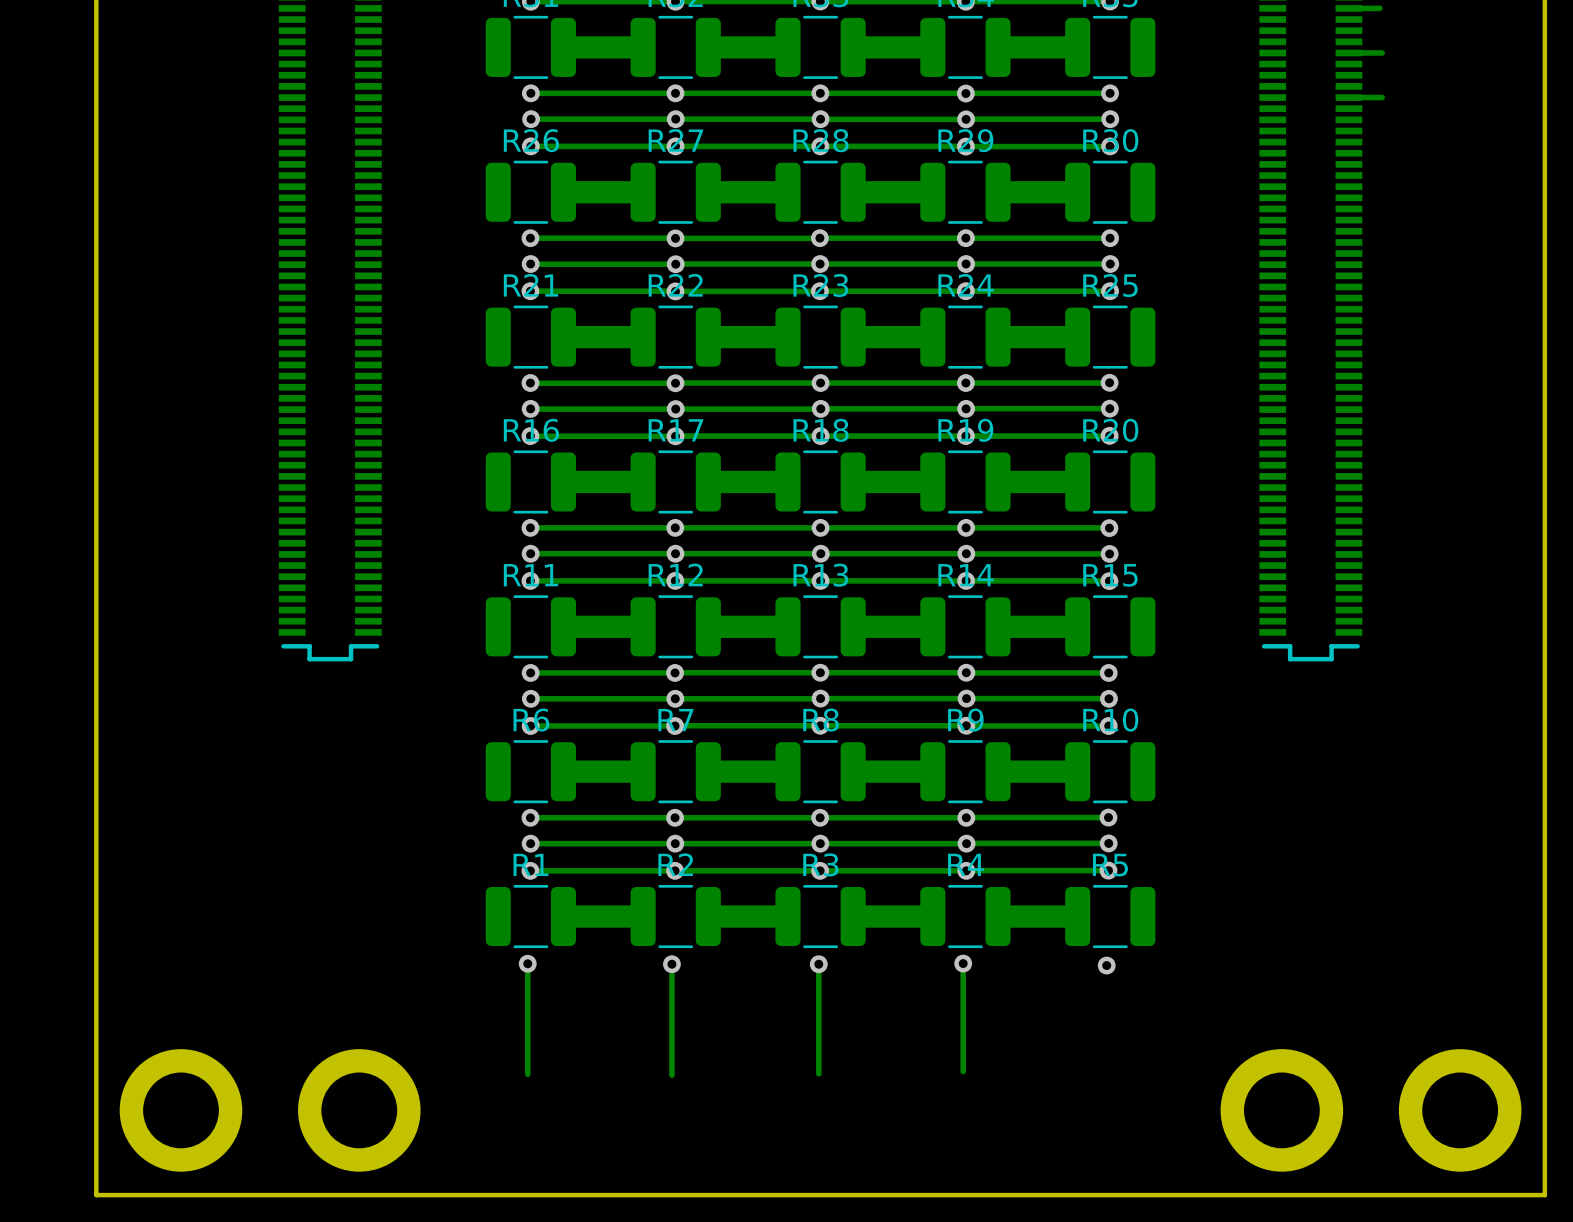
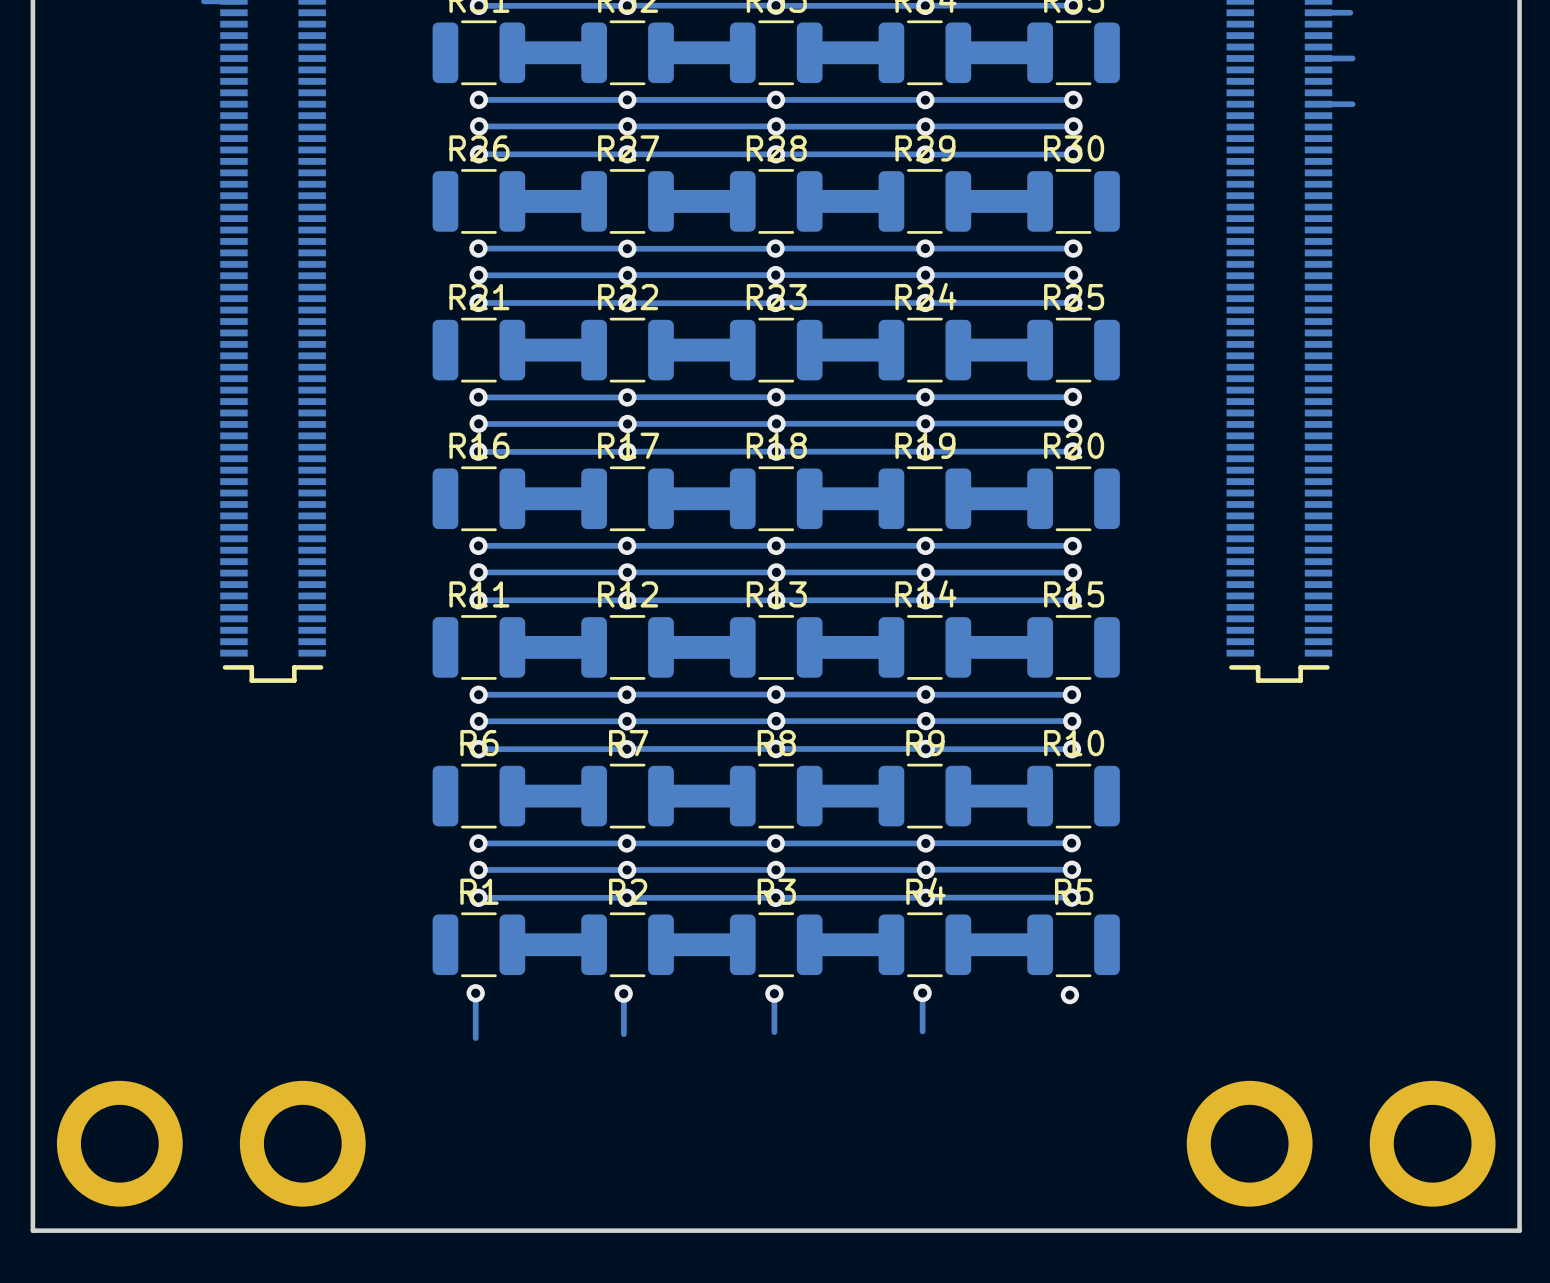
track: (671, 964) (671, 1075) -> (623, 993) (623, 1034)
track: (963, 1000) (963, 1071) -> none
track: (818, 1001) (818, 1073) -> none
track: (527, 1007) (527, 1074) -> none

